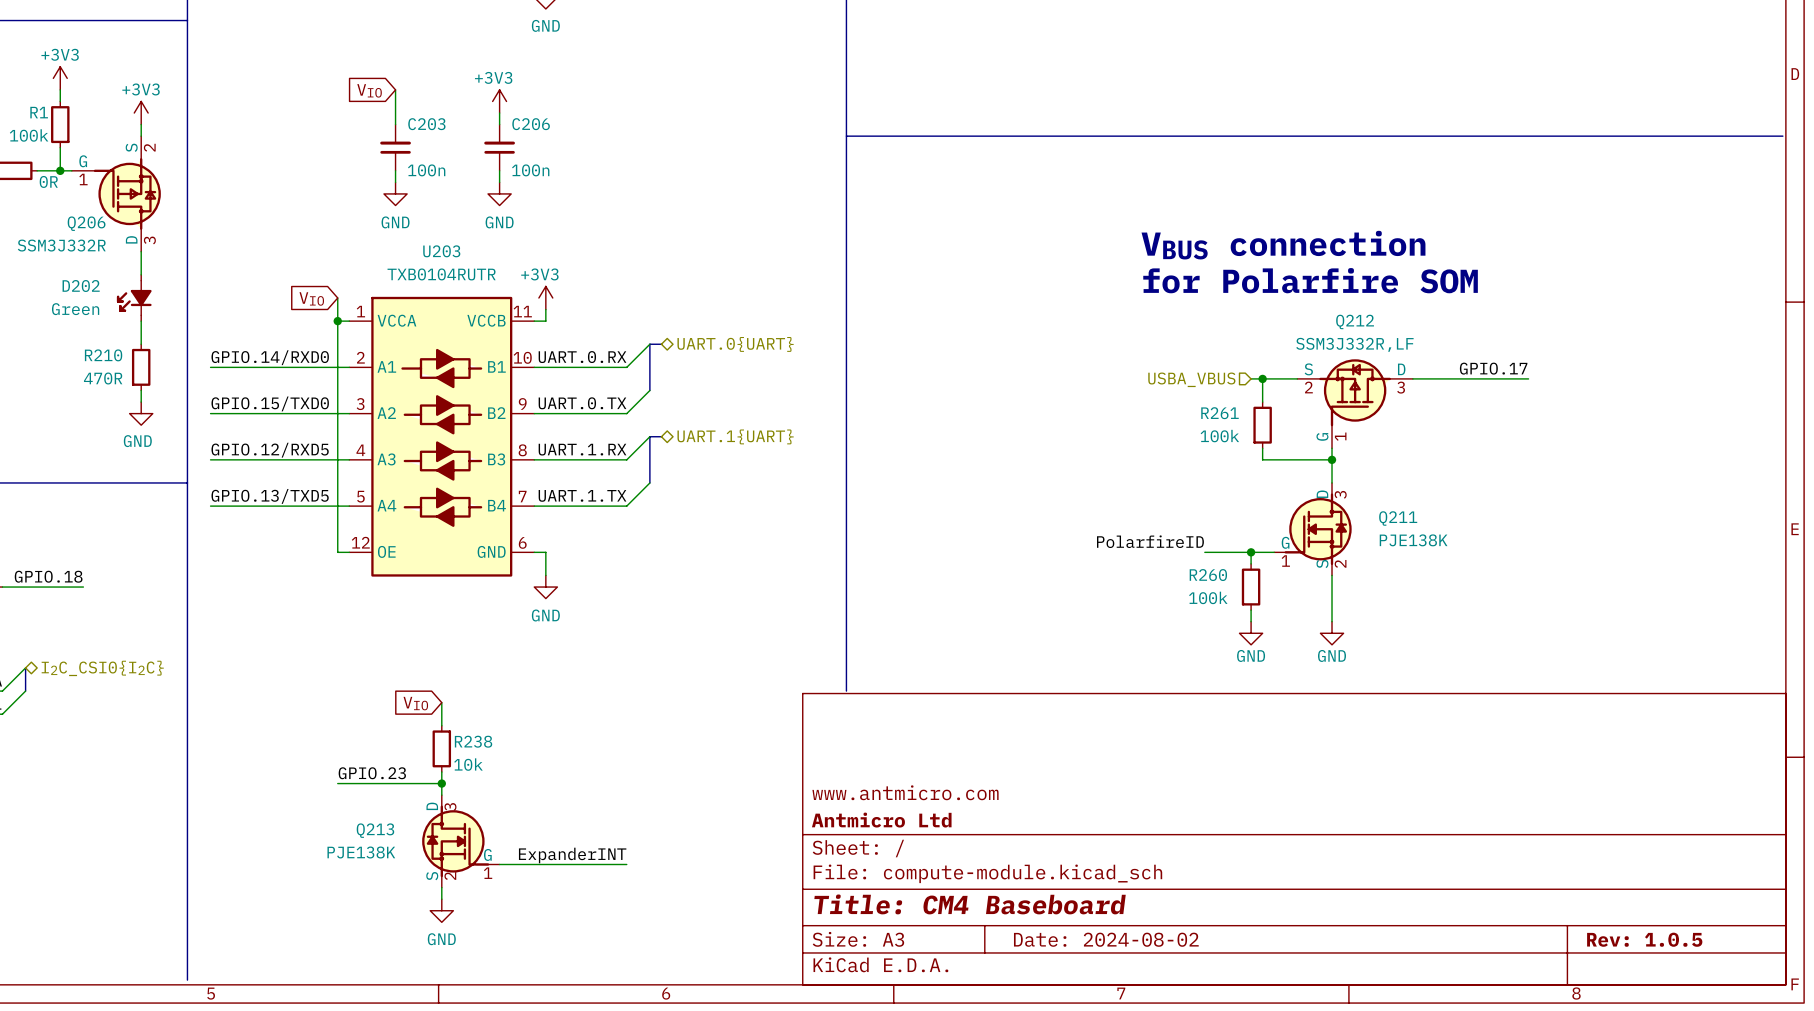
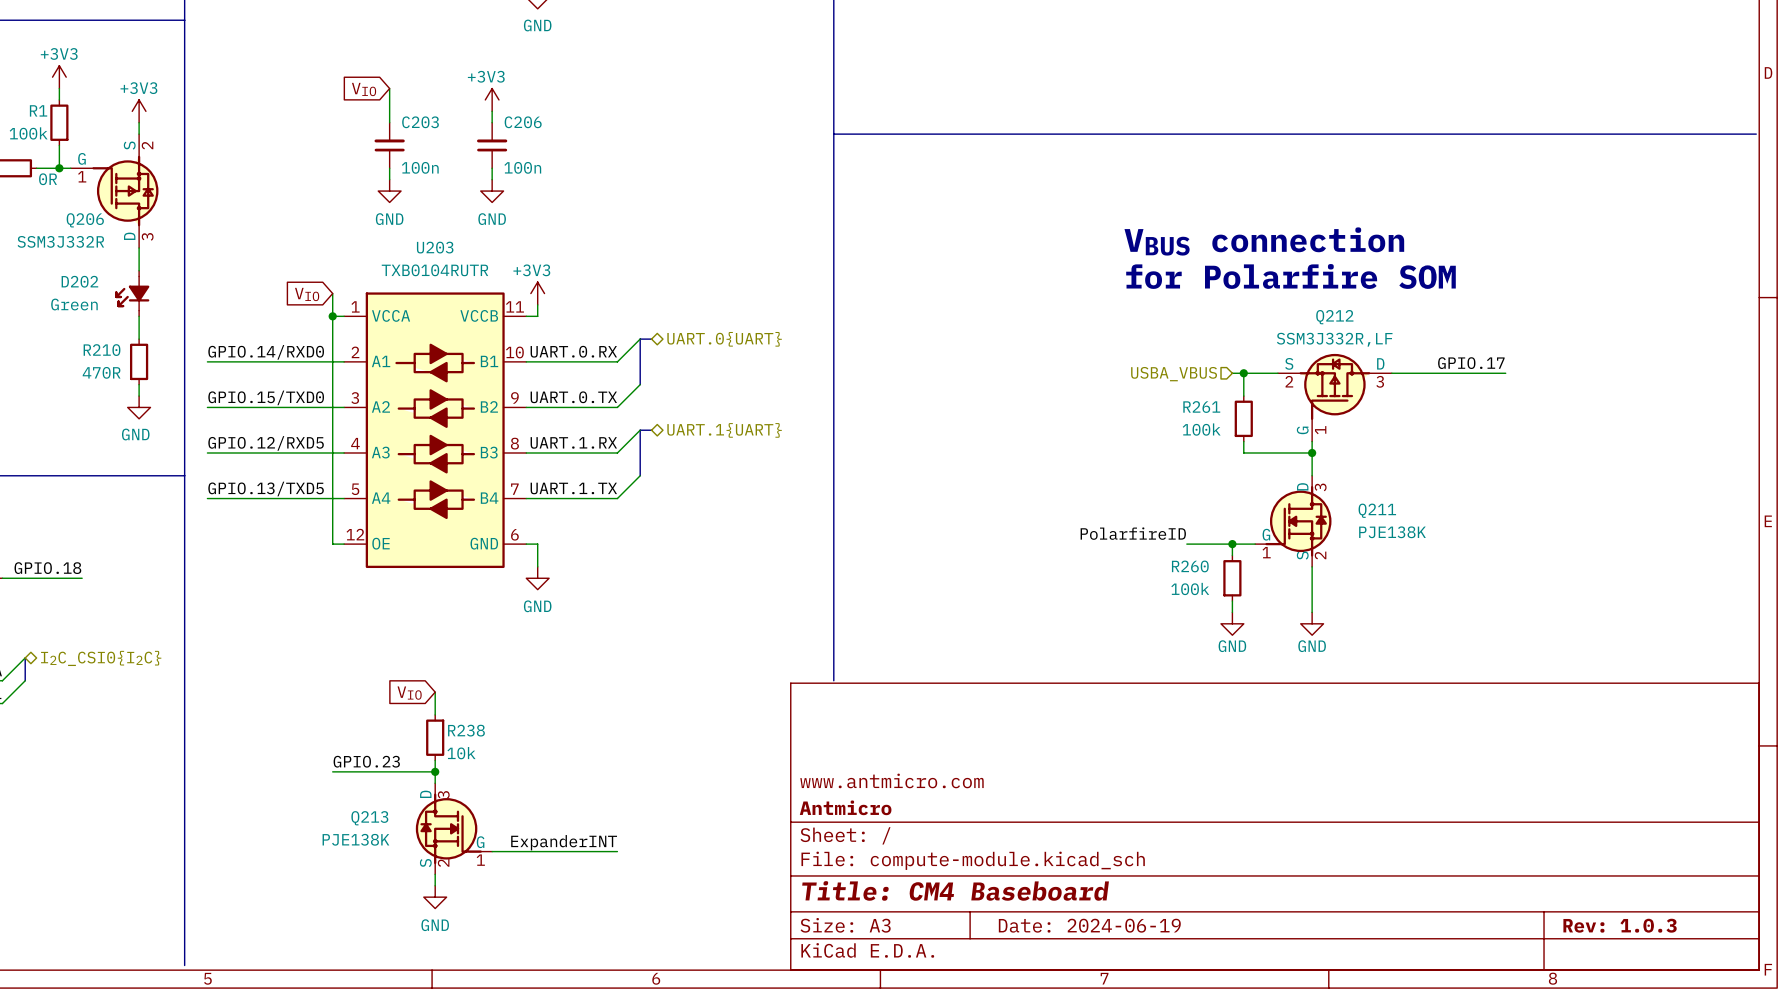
title block: Antmicro Ltd (881, 820) -> Antmicro (845, 807)
title block: Date: 2024-08-02 (1106, 939) -> Date: 2024-06-19 (1089, 925)
title block: Rev: 1.0.5 (1644, 939) -> Rev: 1.0.3 (1620, 925)

